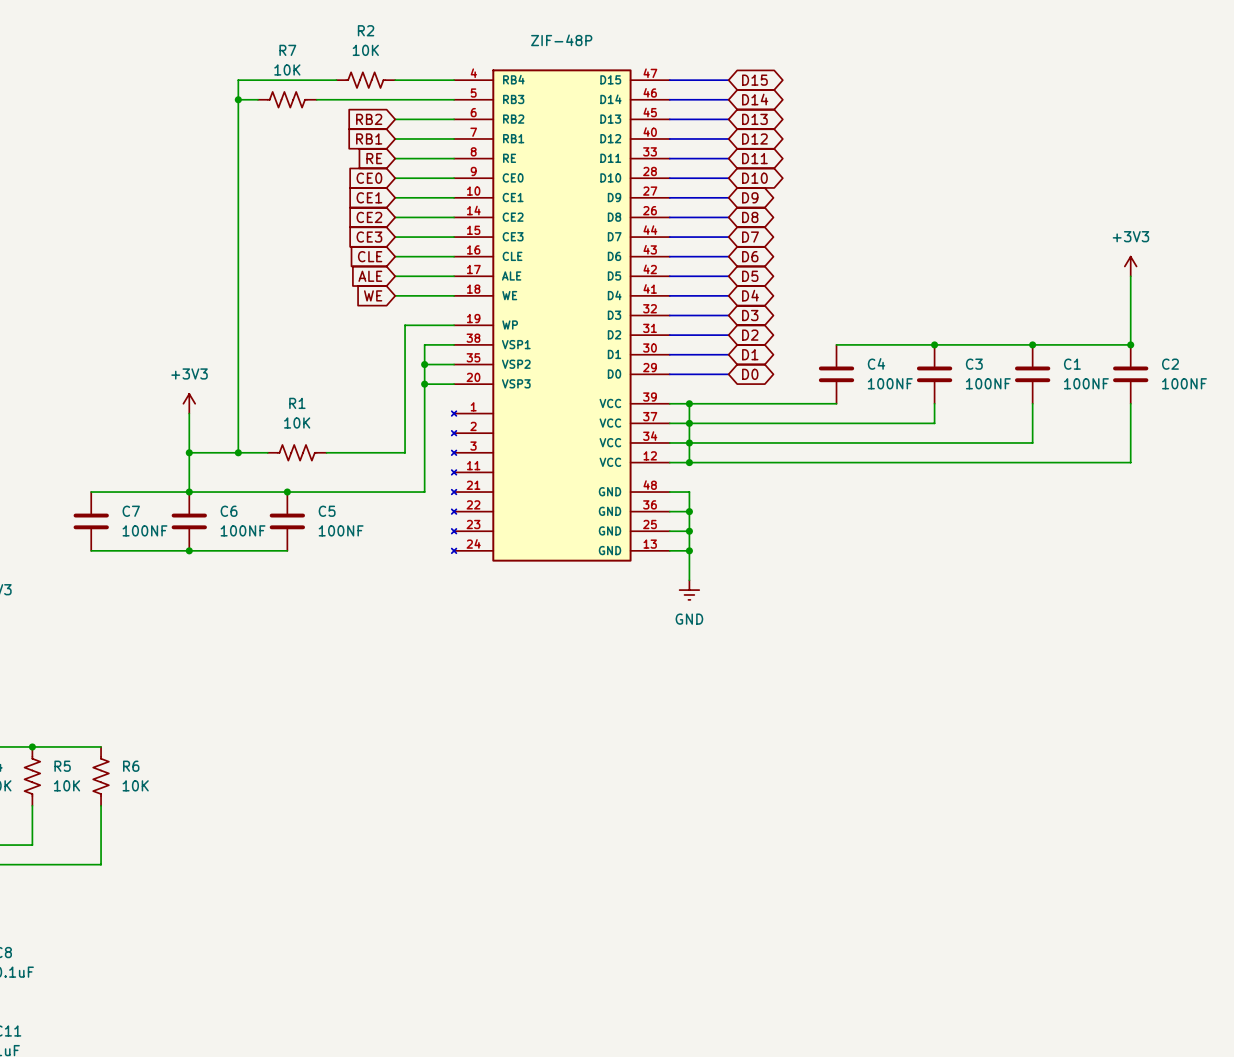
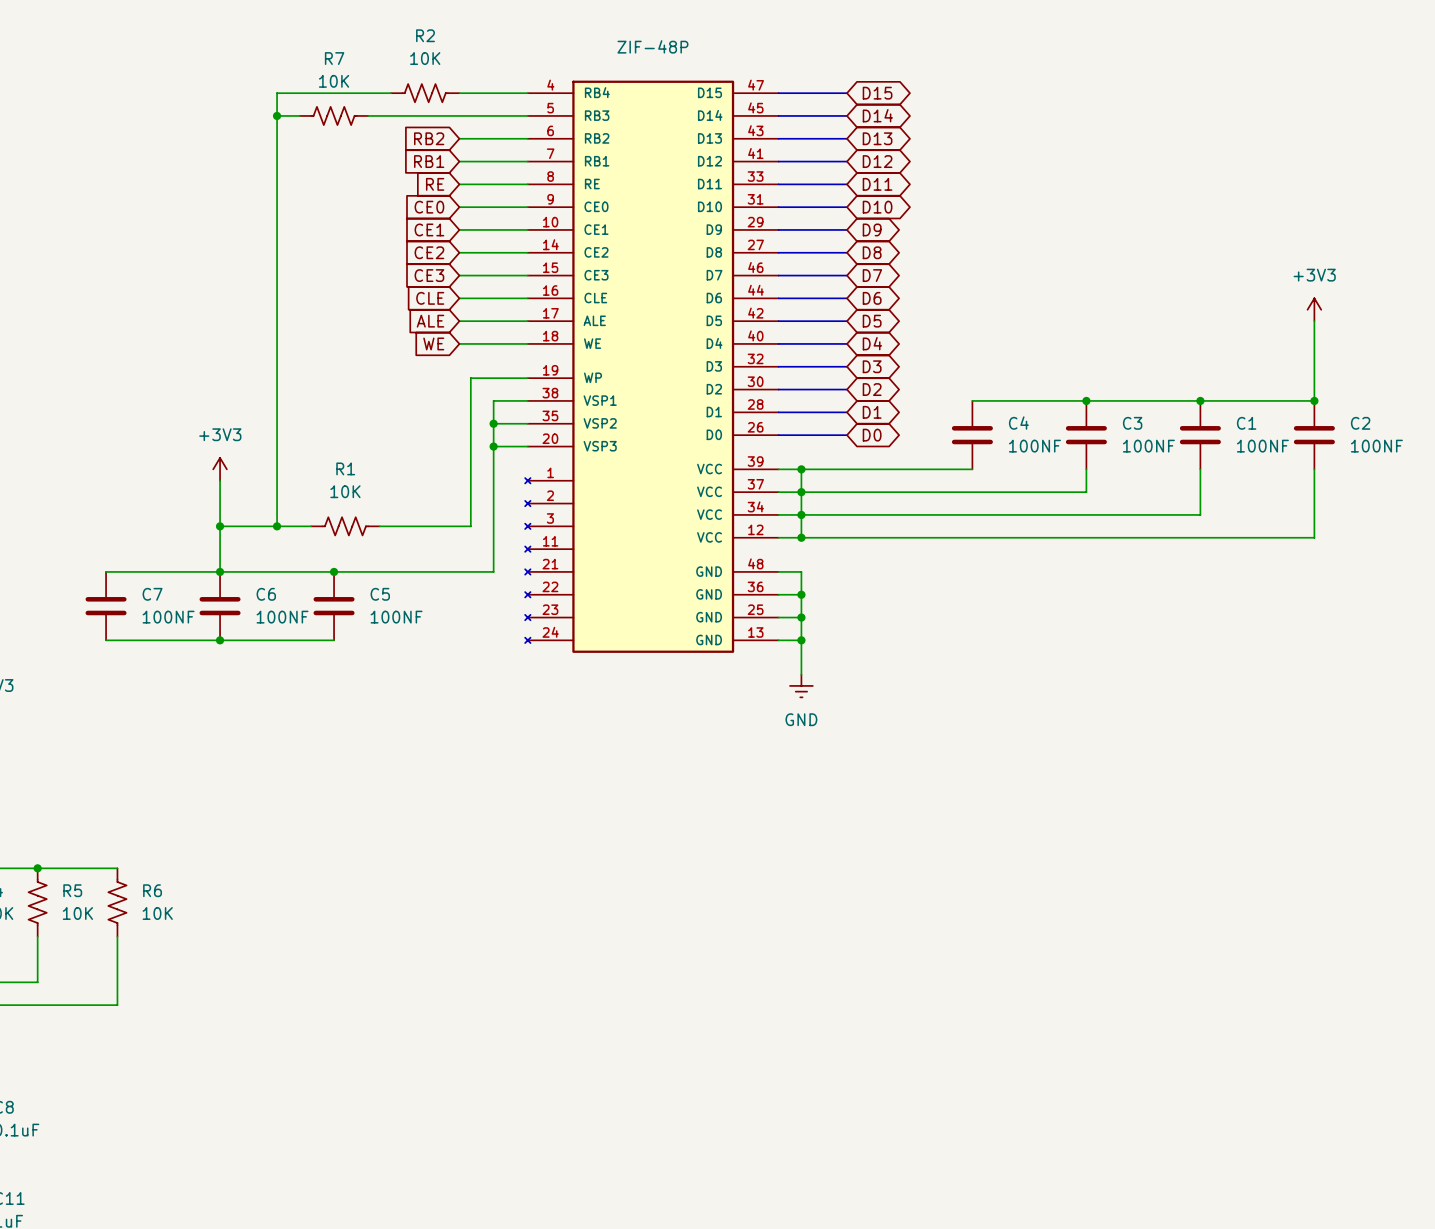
ZIF-48P symbol: [451, 69, 670, 562] -> [525, 80, 779, 653]

